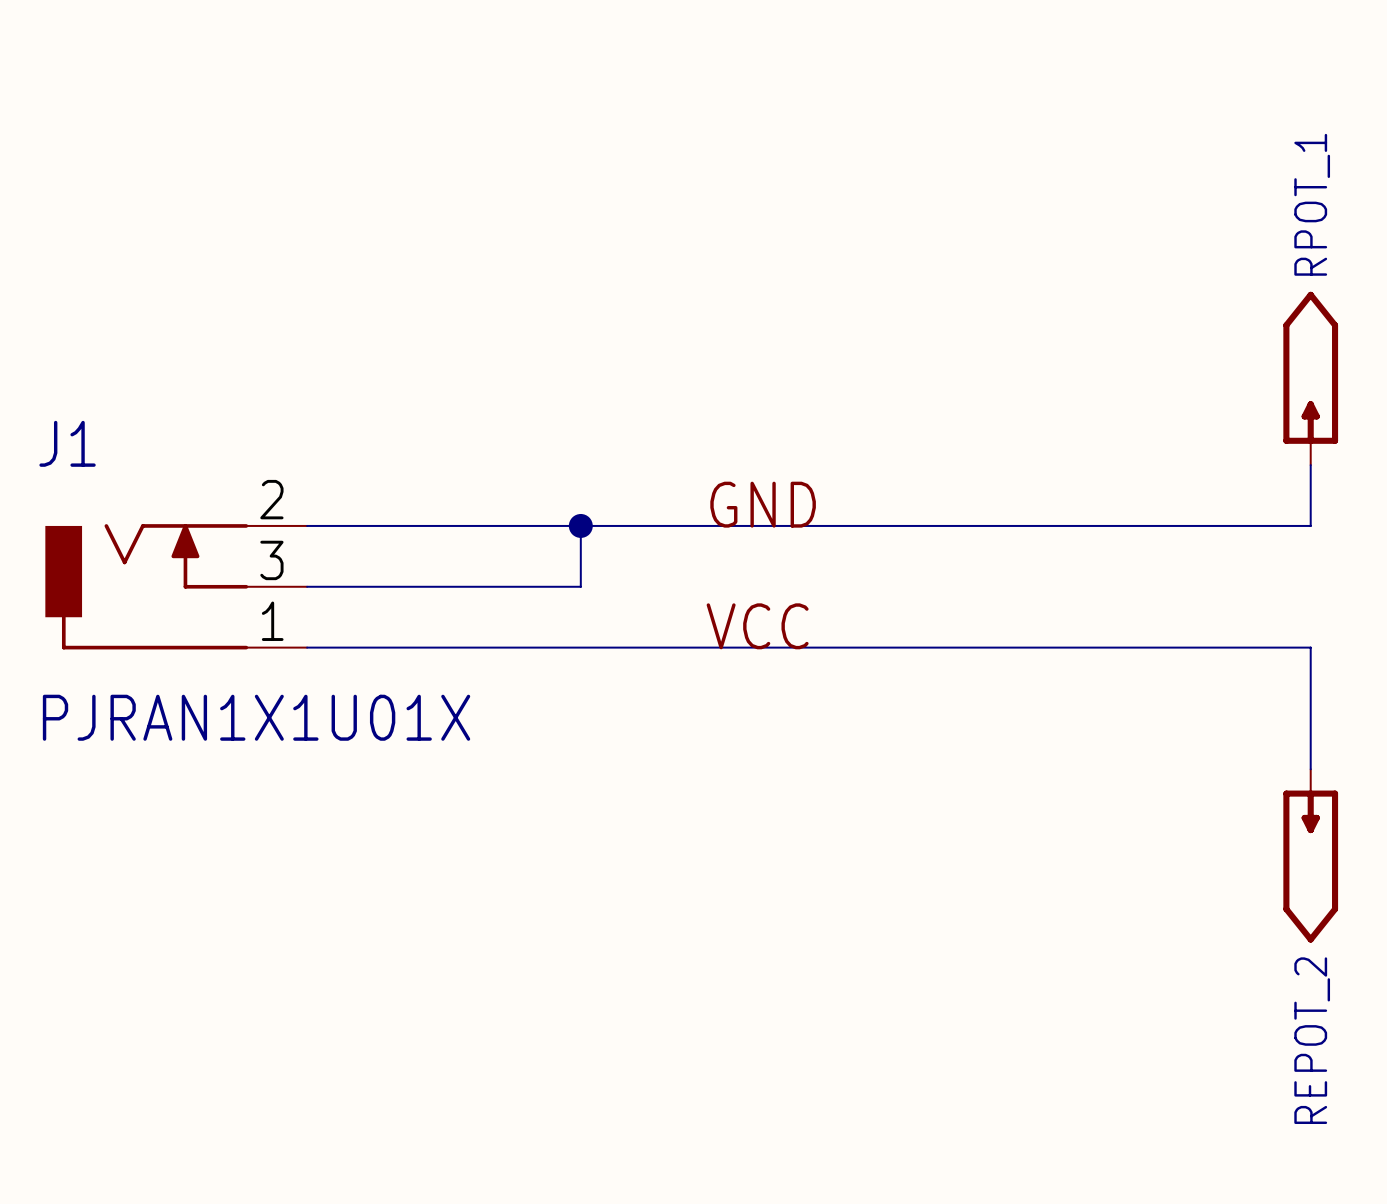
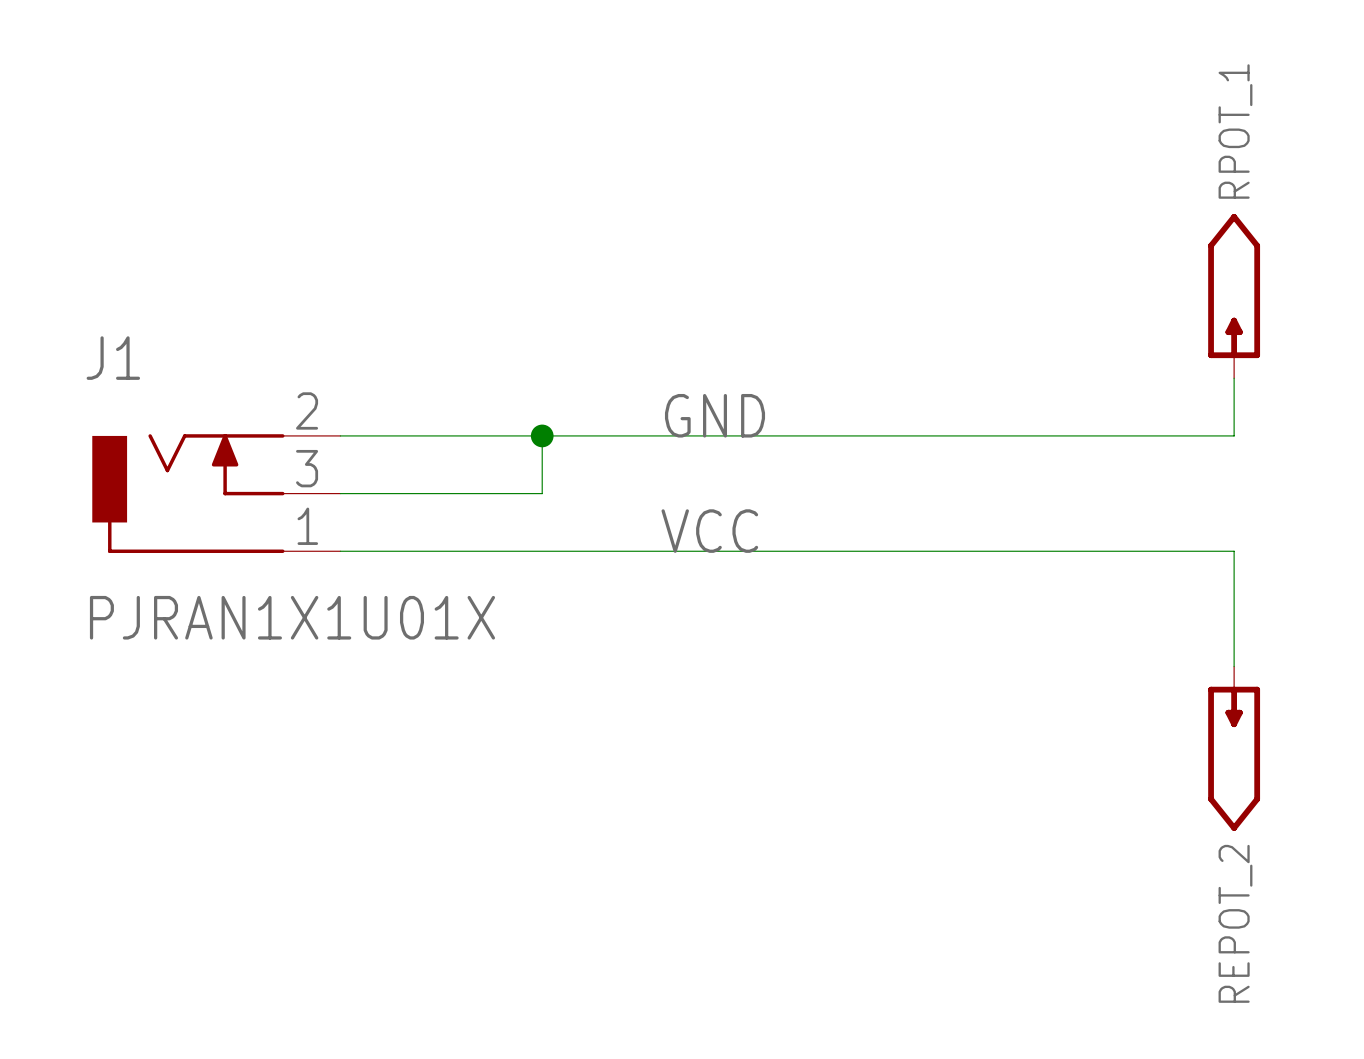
J1 position: (176, 586) -> (216, 493)

